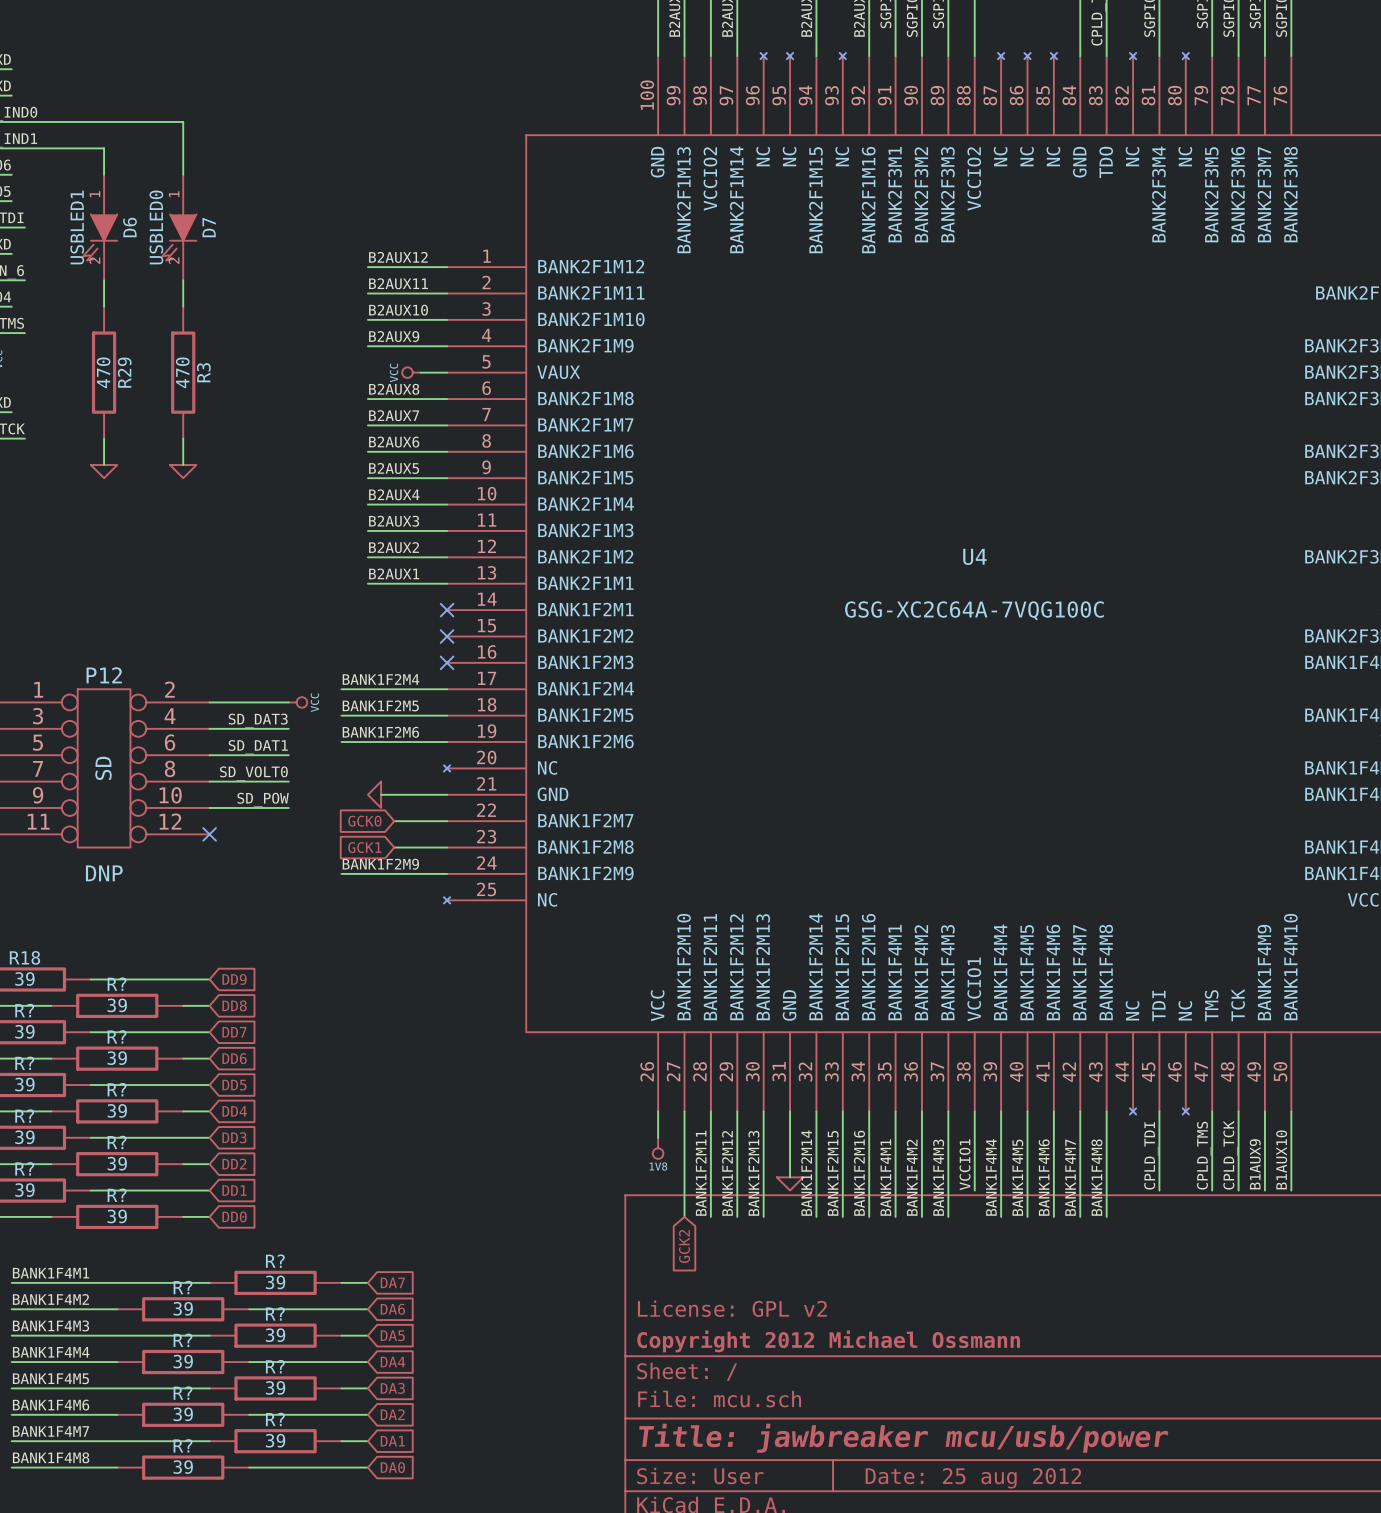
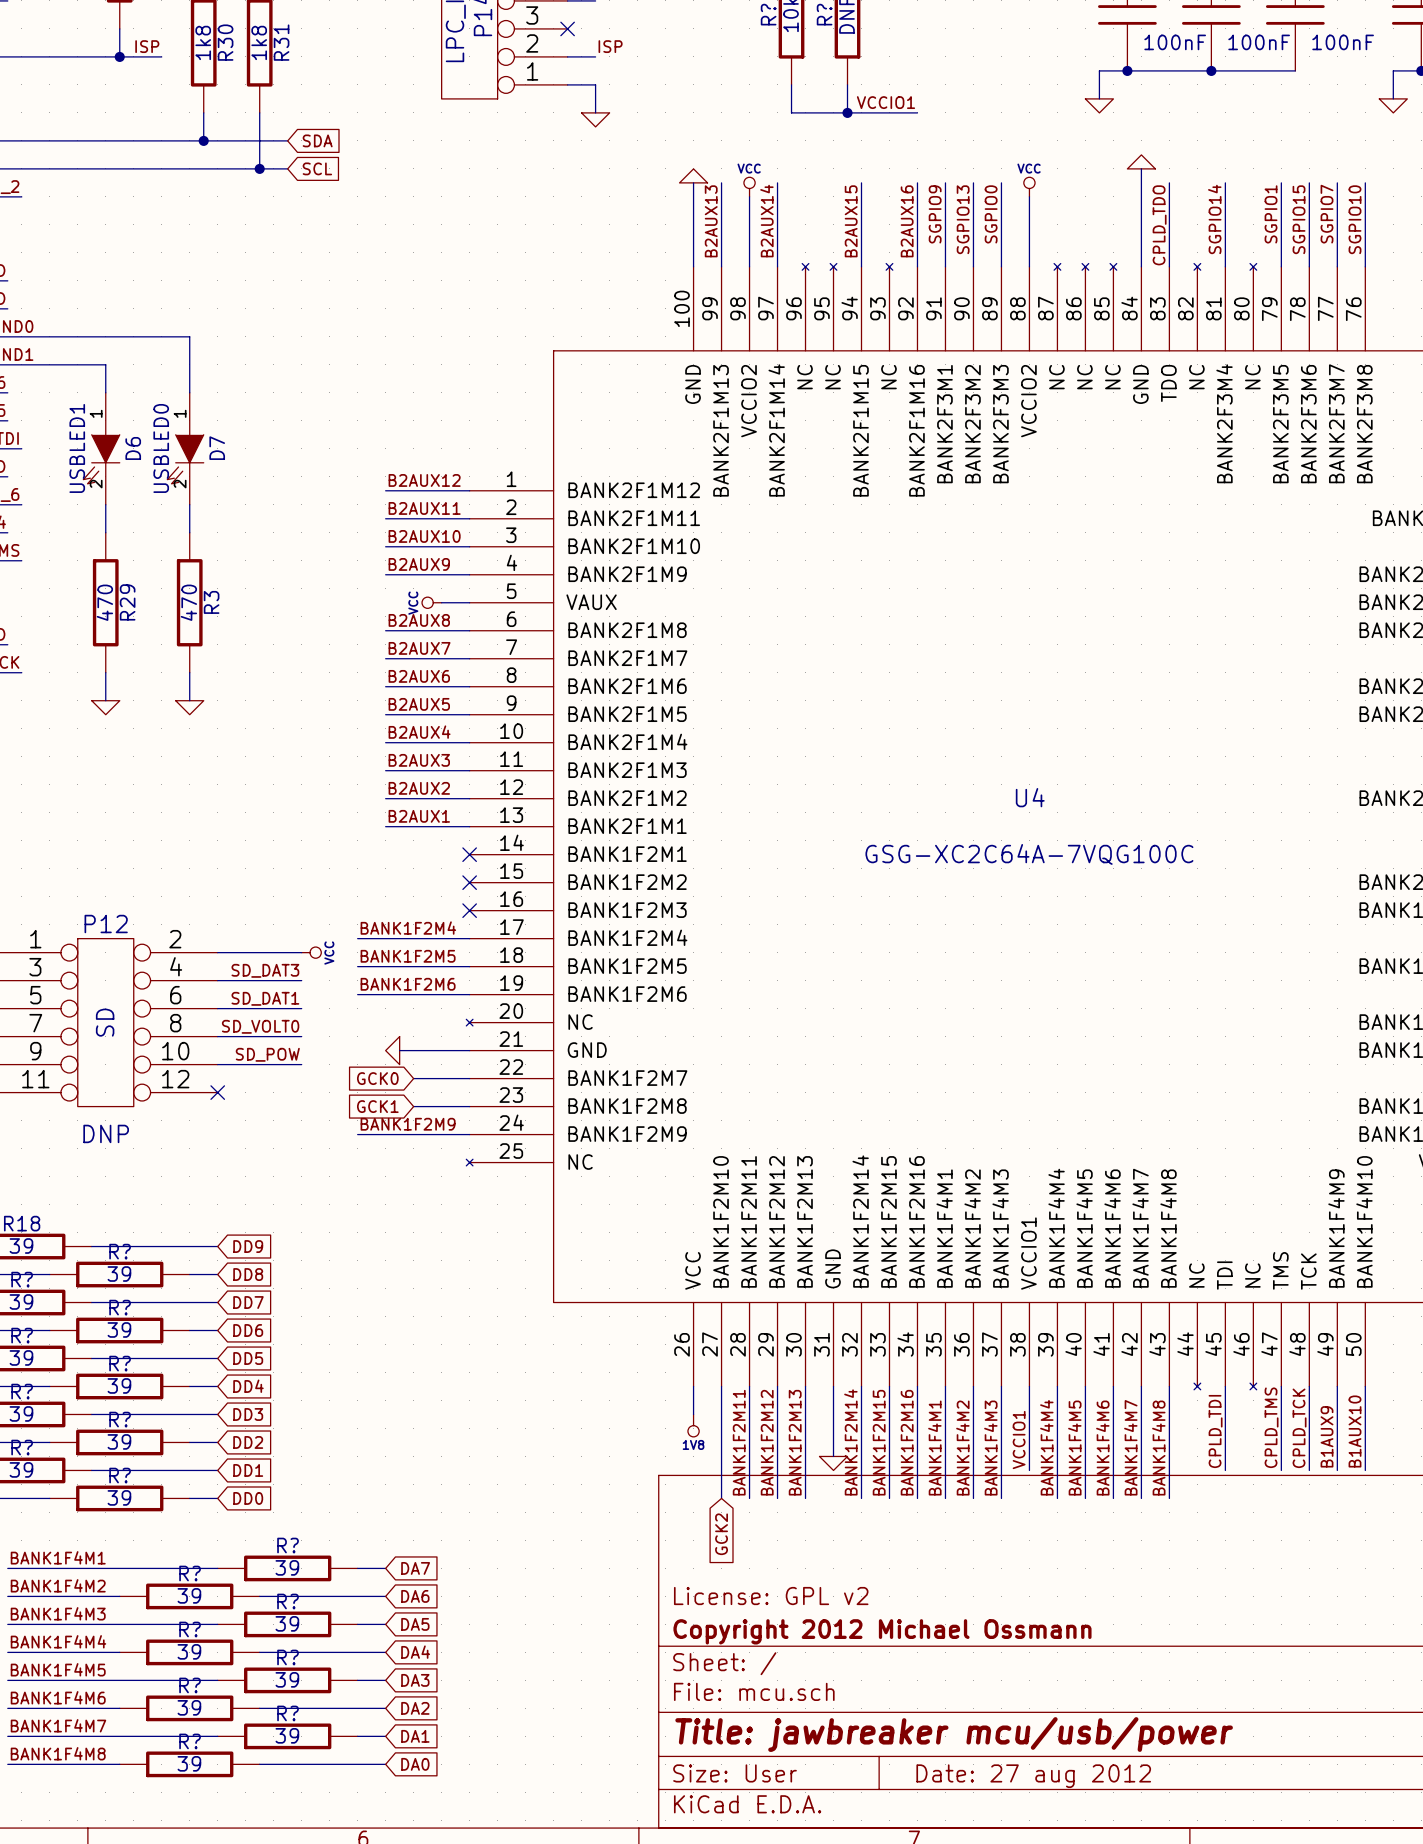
title block: Date: 25 aug 2012 (973, 1478) -> Date: 27 aug 2012 (1033, 1776)

